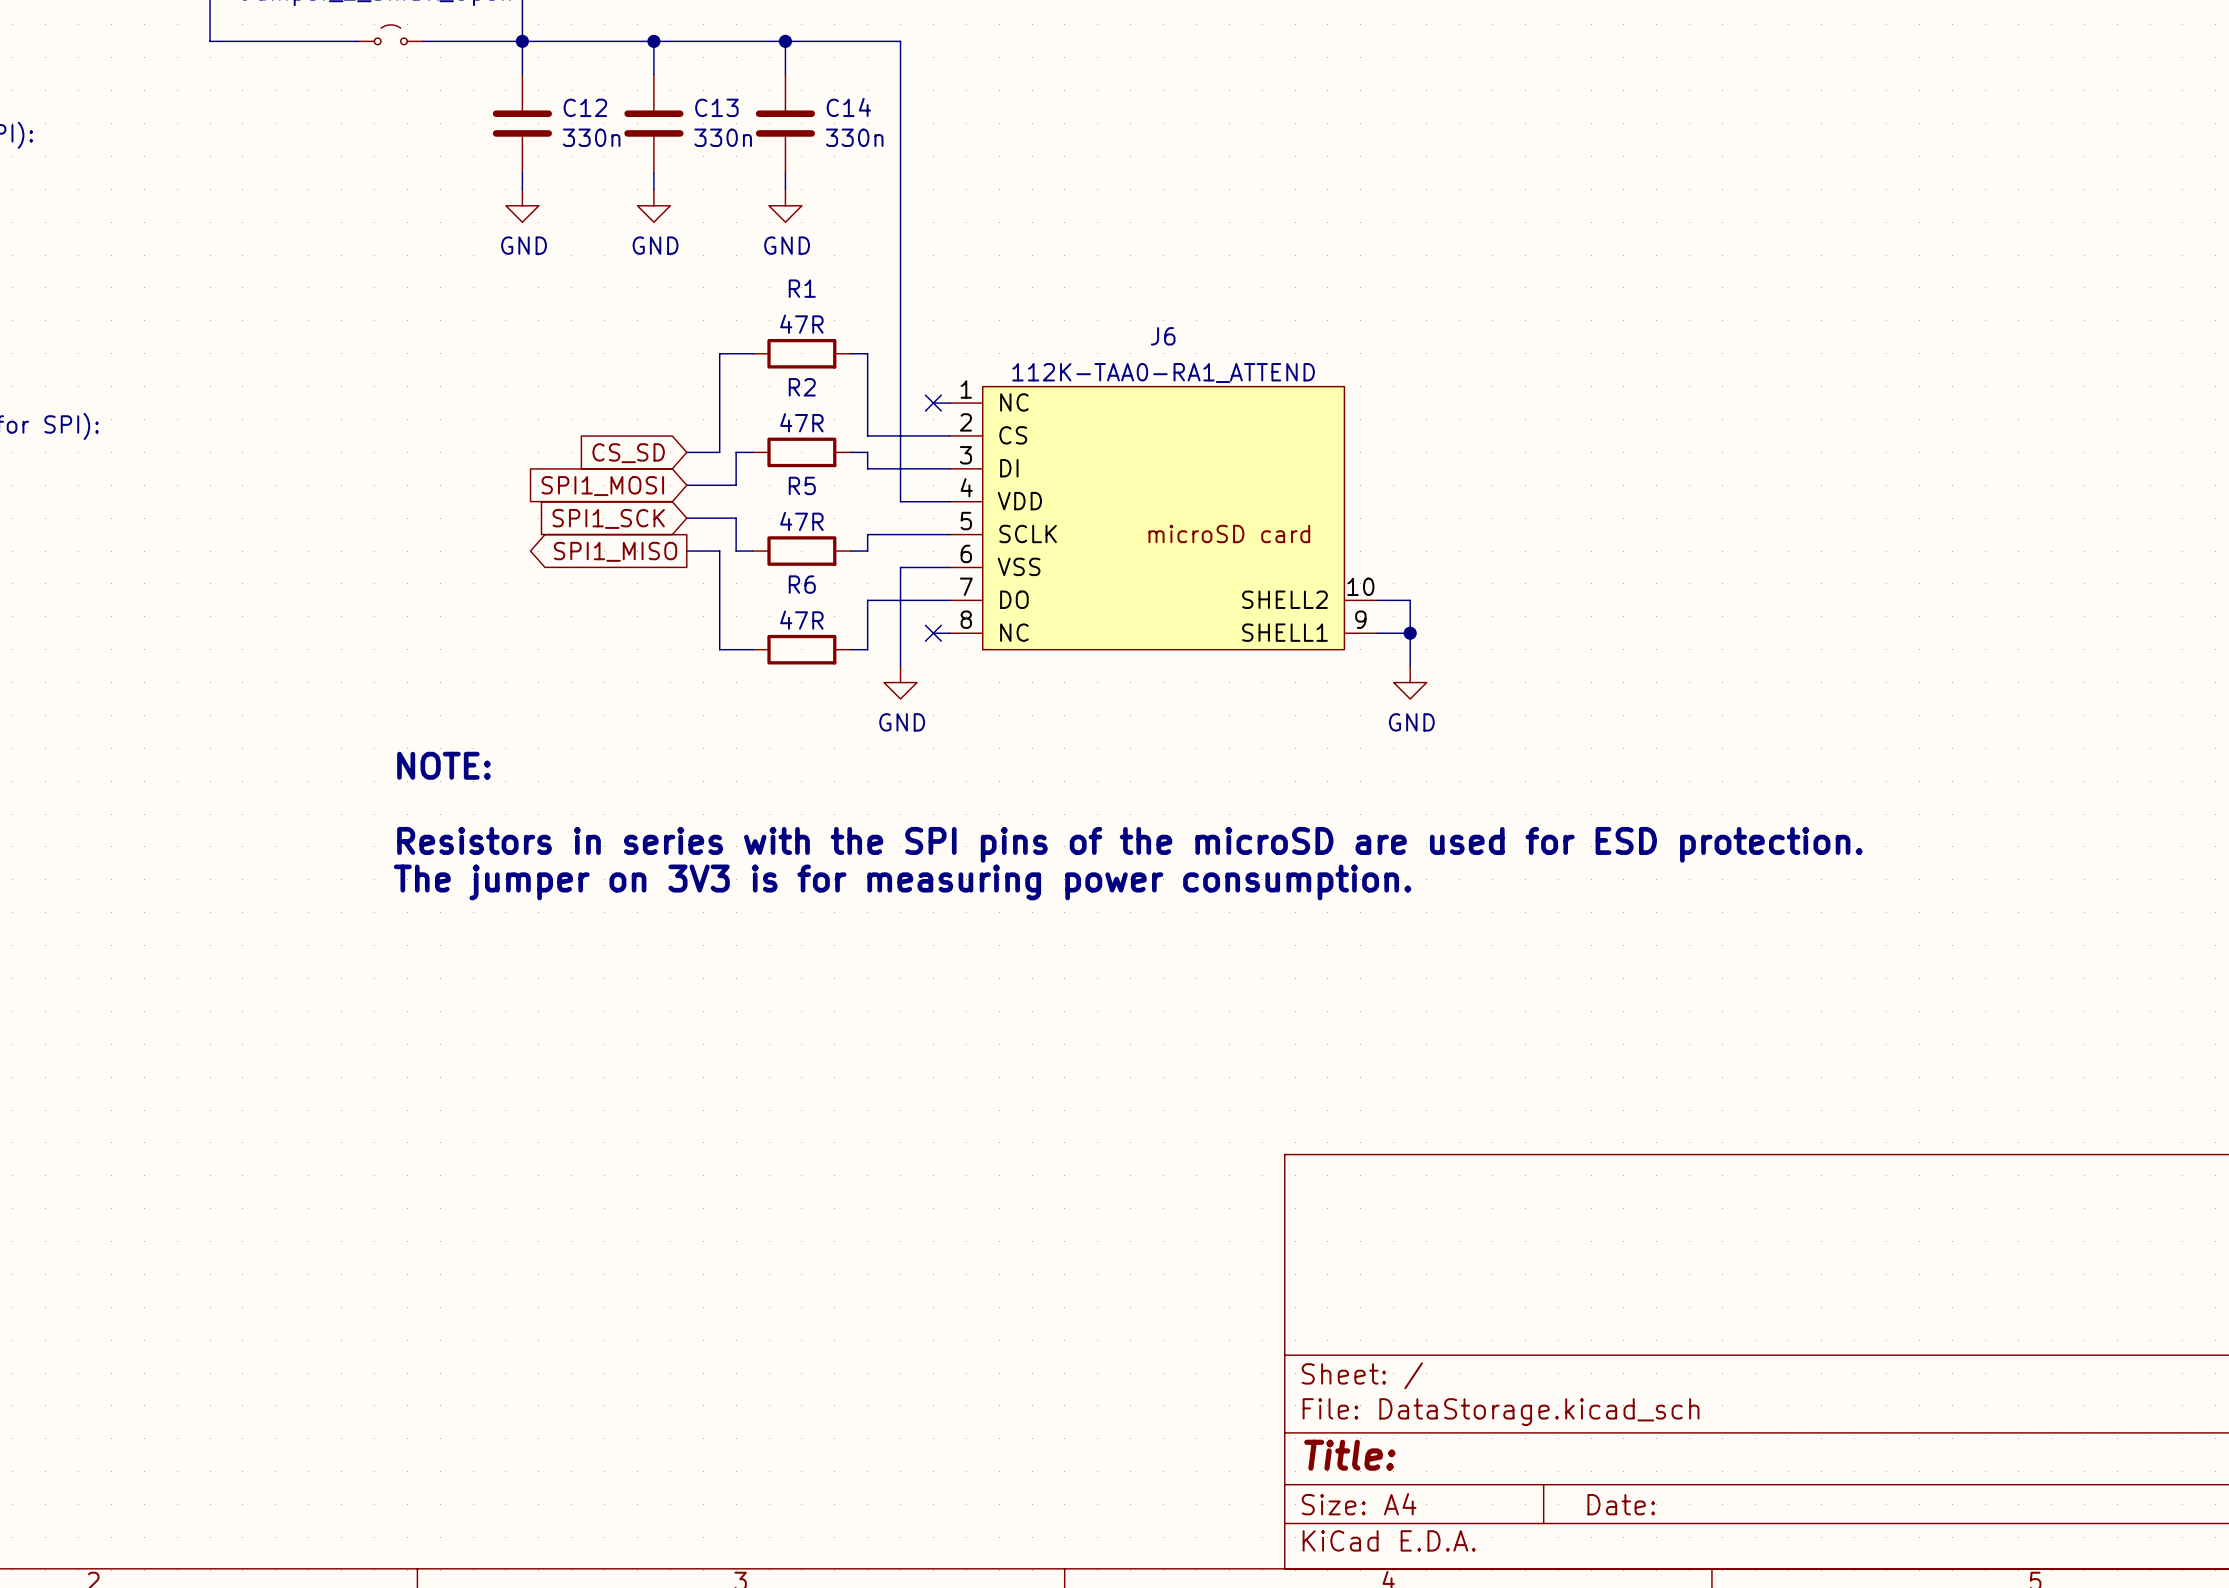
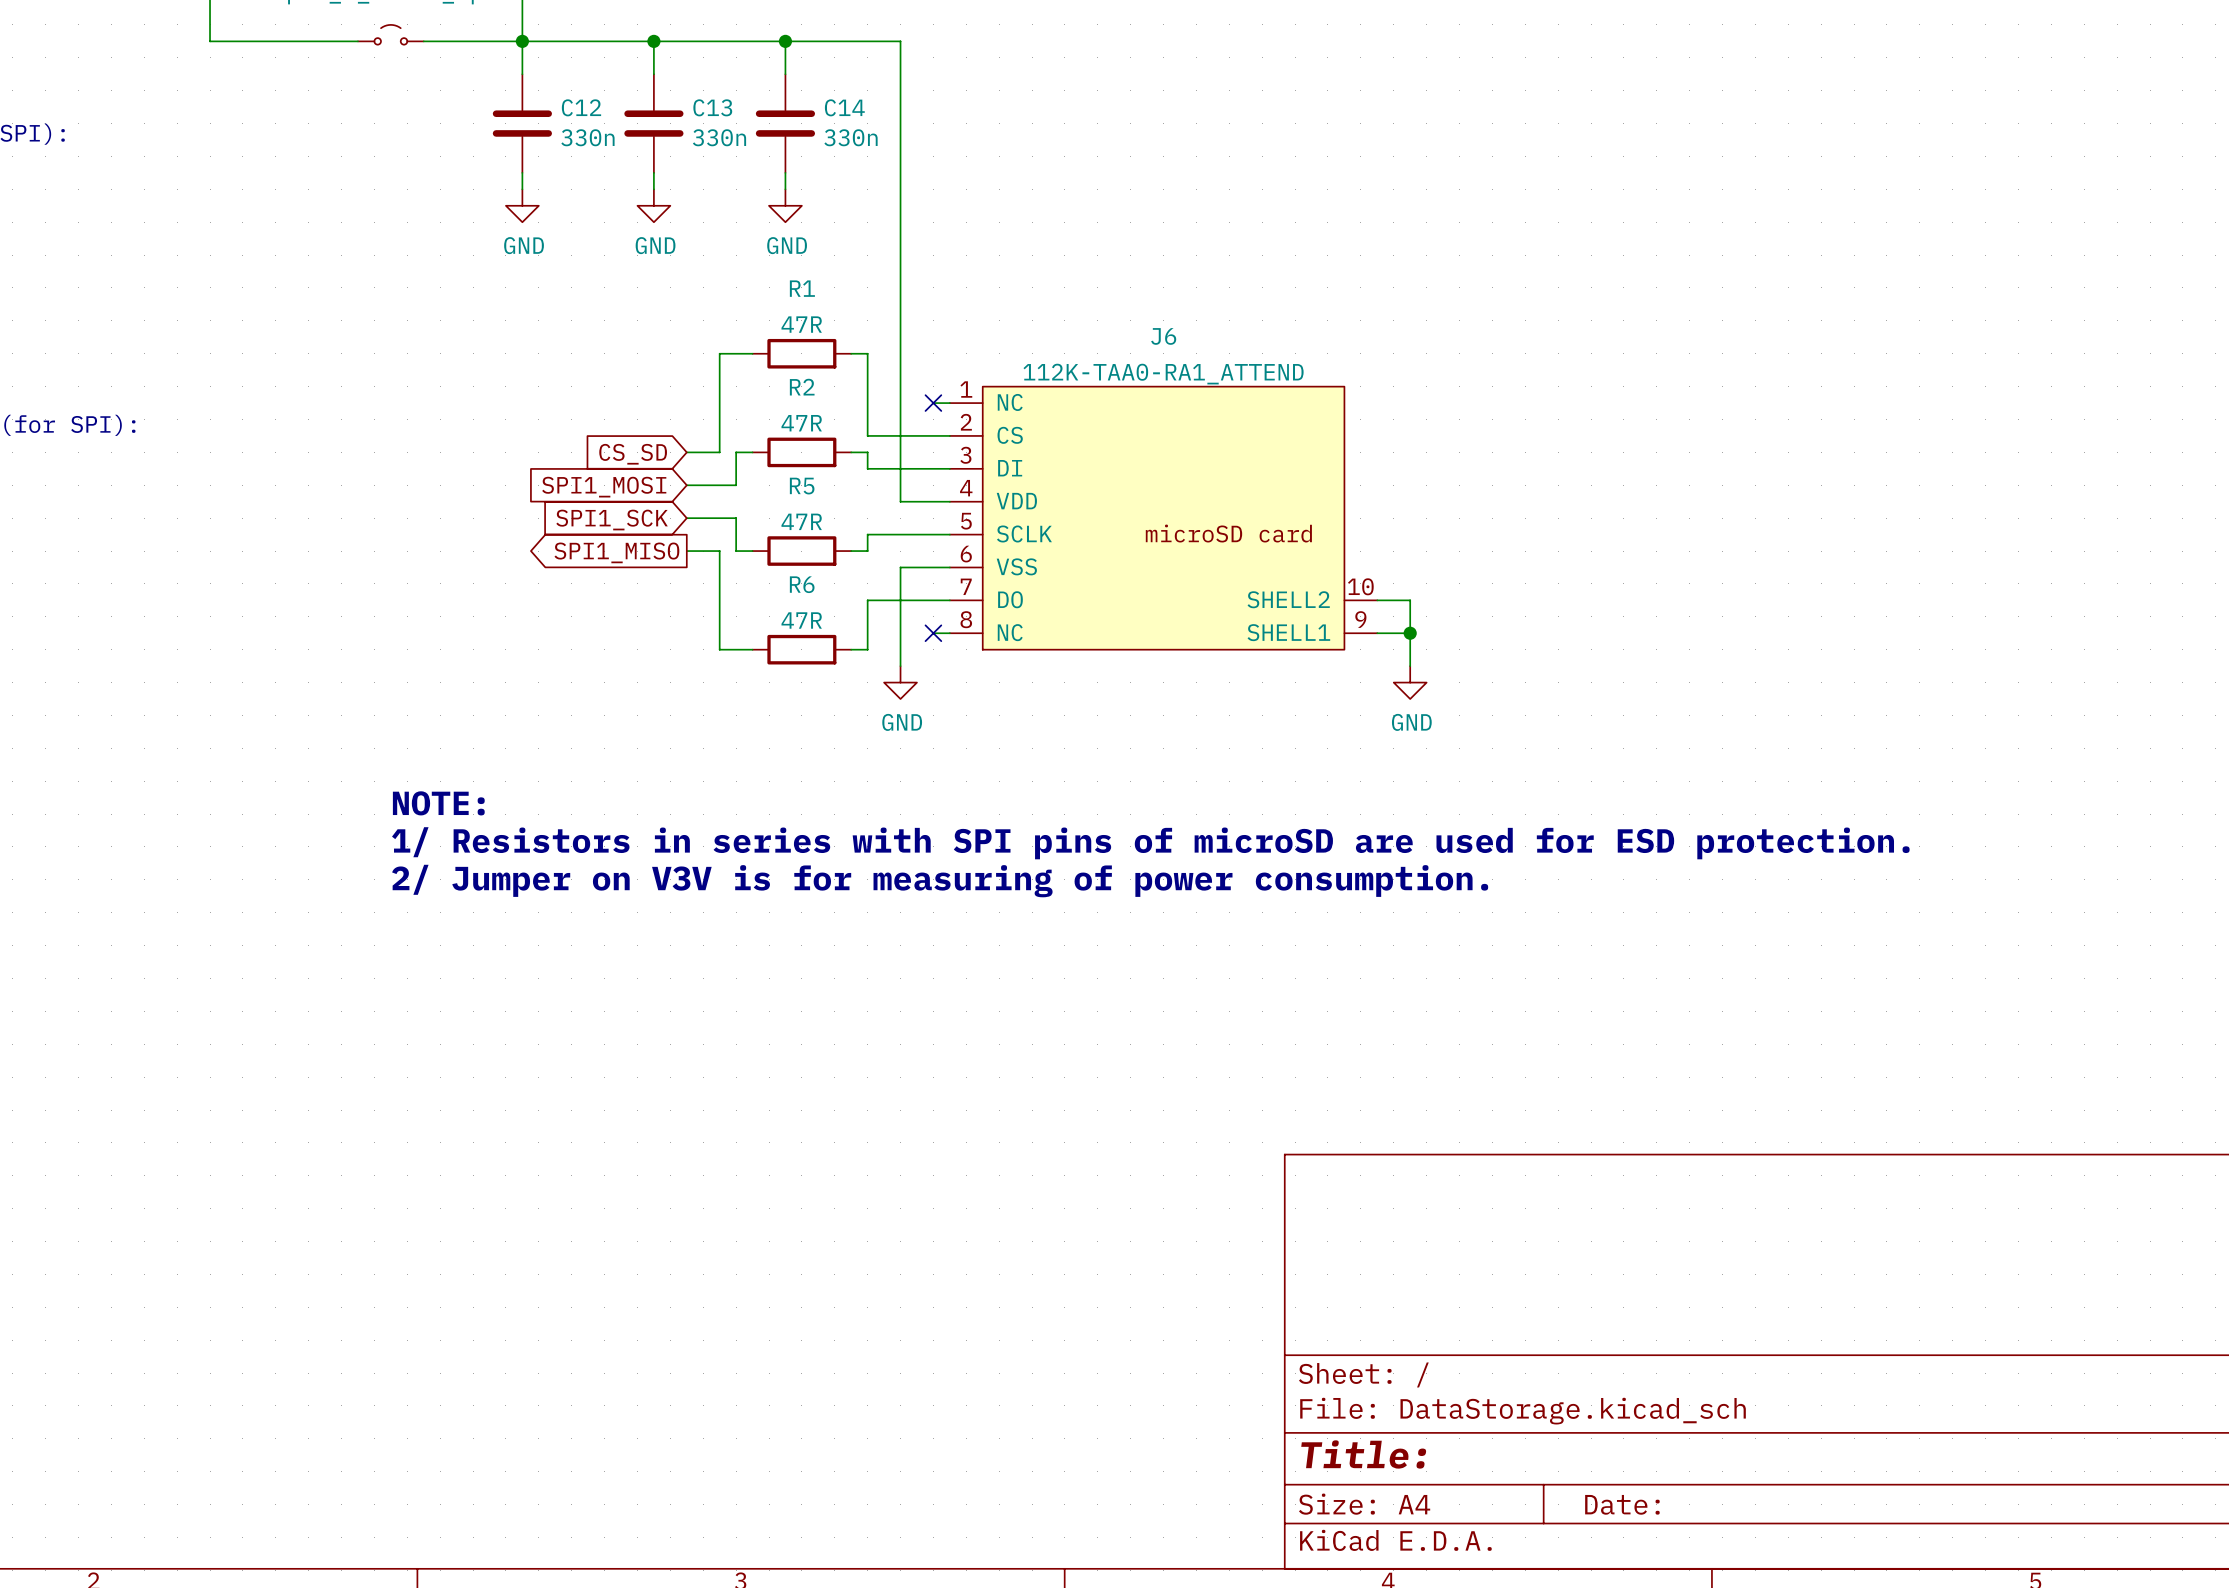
text position: NOTE: (443, 765) -> NOTE: (438, 803)
text: Resistors in series with the SPI pins of the microSD are used for ESD protection. (1129, 844) -> 1/ Resistors in series with SPI pins of microSD are used for ESD protection. (1150, 843)
text: The jumper on 3V3 is for measuring power consumption. (902, 882) -> 2/ Jumper on V3V is for measuring of power consumption. (940, 881)

